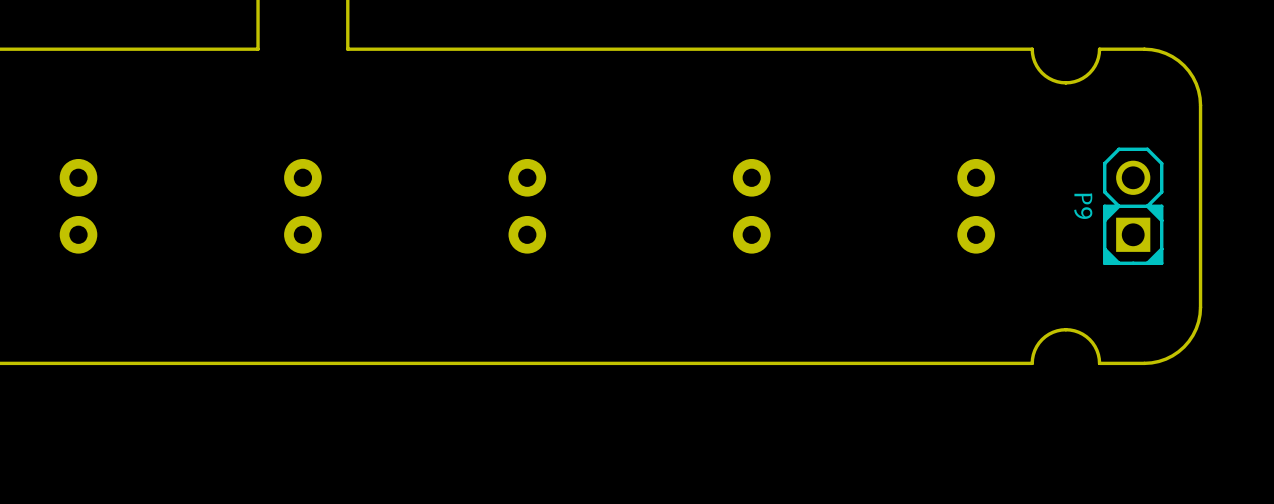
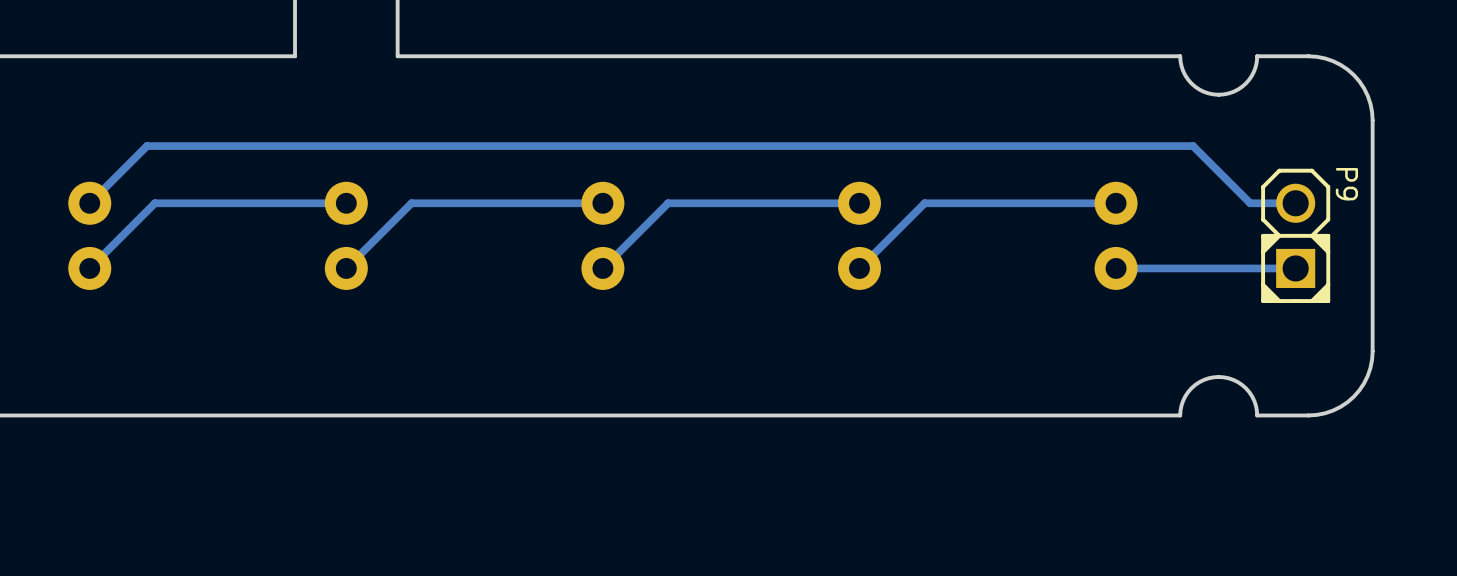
track: none -> (346, 203) (154, 203) (89, 268)
track: none -> (602, 203) (411, 203) (346, 268)
track: none -> (859, 203) (668, 203) (602, 268)
track: none -> (1116, 203) (924, 203) (859, 268)
track: none -> (1295, 203) (1250, 203) (1193, 146) (146, 146) (89, 203)
P9 name position: P9 (1083, 206) -> P9 (1346, 184)
track: none -> (1295, 268) (1116, 268)

